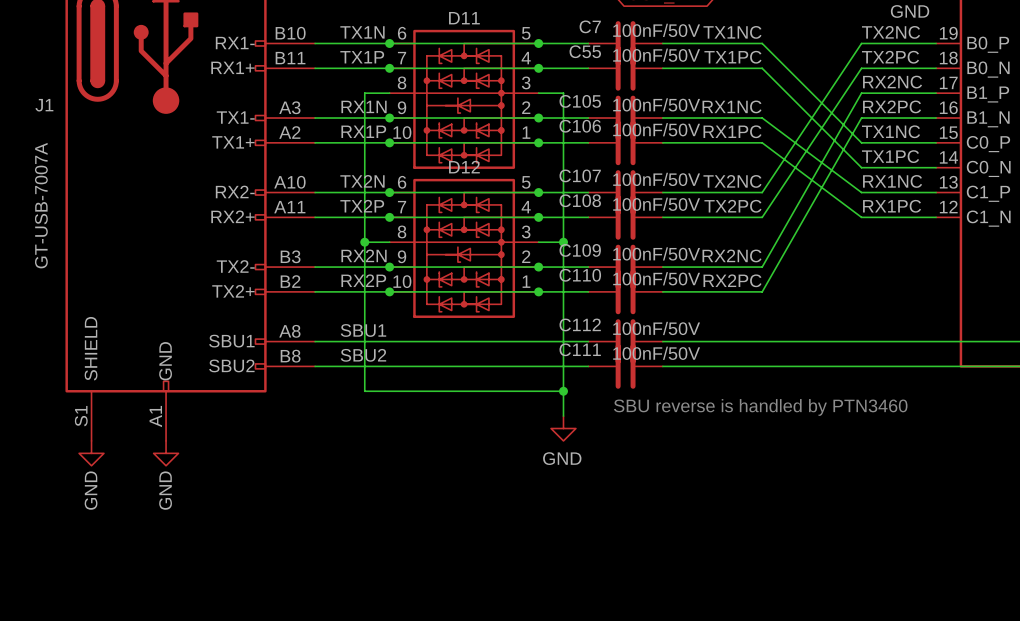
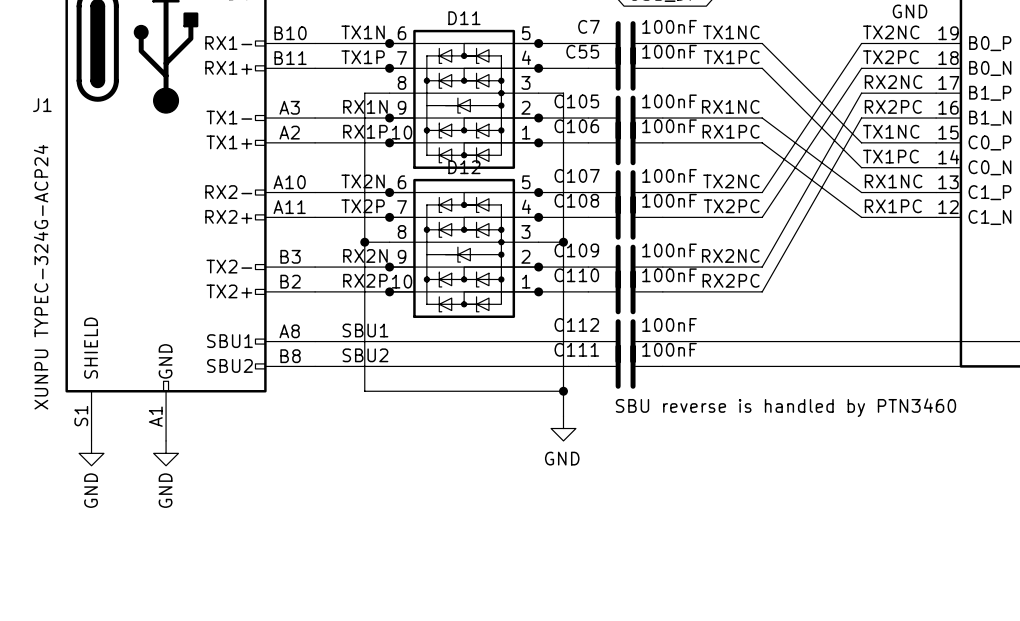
C7 value: 100nF/50V (656, 30) -> 100nF (669, 26)
C55 value: 100nF/50V (656, 55) -> 100nF (669, 51)
C105 value: 100nF/50V (656, 104) -> 100nF (669, 101)
C106 value: 100nF/50V (656, 129) -> 100nF (669, 126)
C107 value: 100nF/50V (656, 179) -> 100nF (669, 175)
C108 value: 100nF/50V (656, 204) -> 100nF (669, 200)
J1 value: GT-USB-7007A (41, 205) -> XUNPU TYPEC-324G-ACP24 (41, 277)
C109 value: 100nF/50V (656, 253) -> 100nF (669, 250)
C110 value: 100nF/50V (656, 278) -> 100nF (669, 275)
C112 value: 100nF/50V (656, 328) -> 100nF (669, 324)
C111 value: 100nF/50V (656, 353) -> 100nF (669, 349)

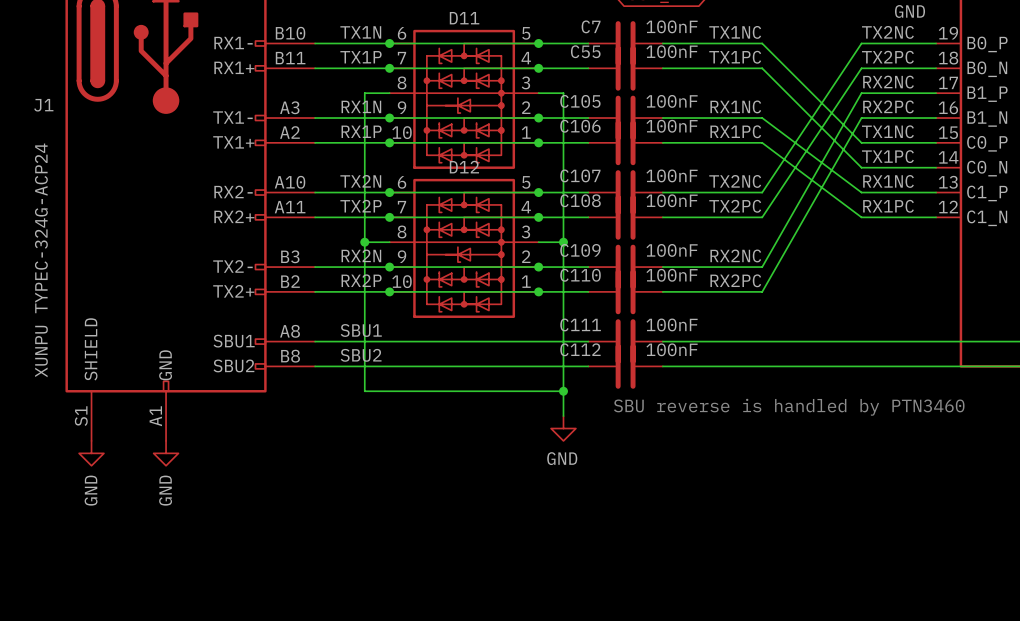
C112 name: C112 (576, 324) -> C111 (580, 324)
C111 name: C111 (576, 349) -> C112 (580, 349)

